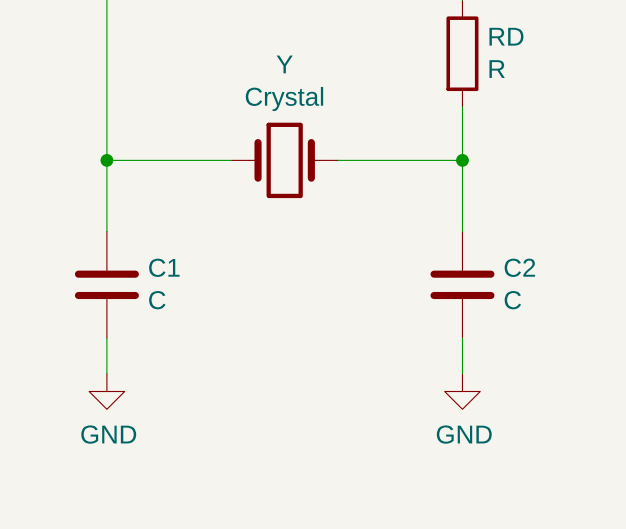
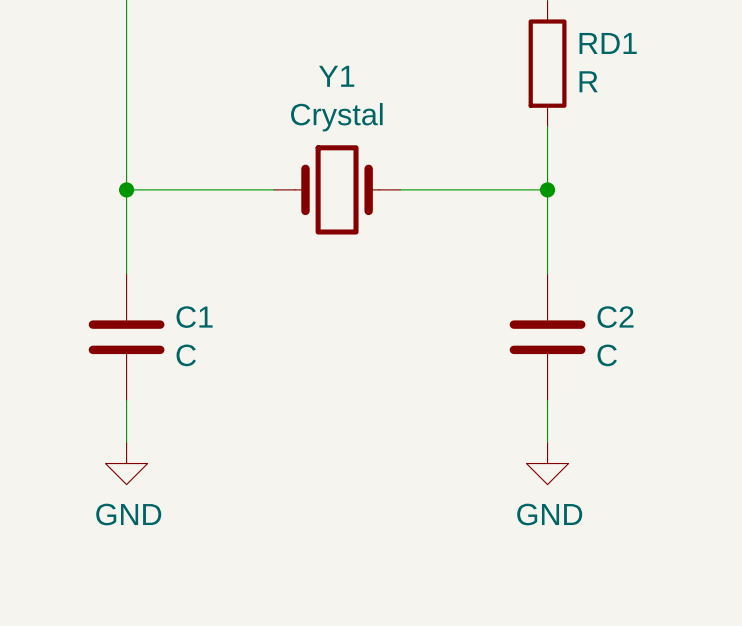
RD name: RD (506, 36) -> RD1 (608, 43)
Y name: Y (284, 64) -> Y1 (336, 76)

